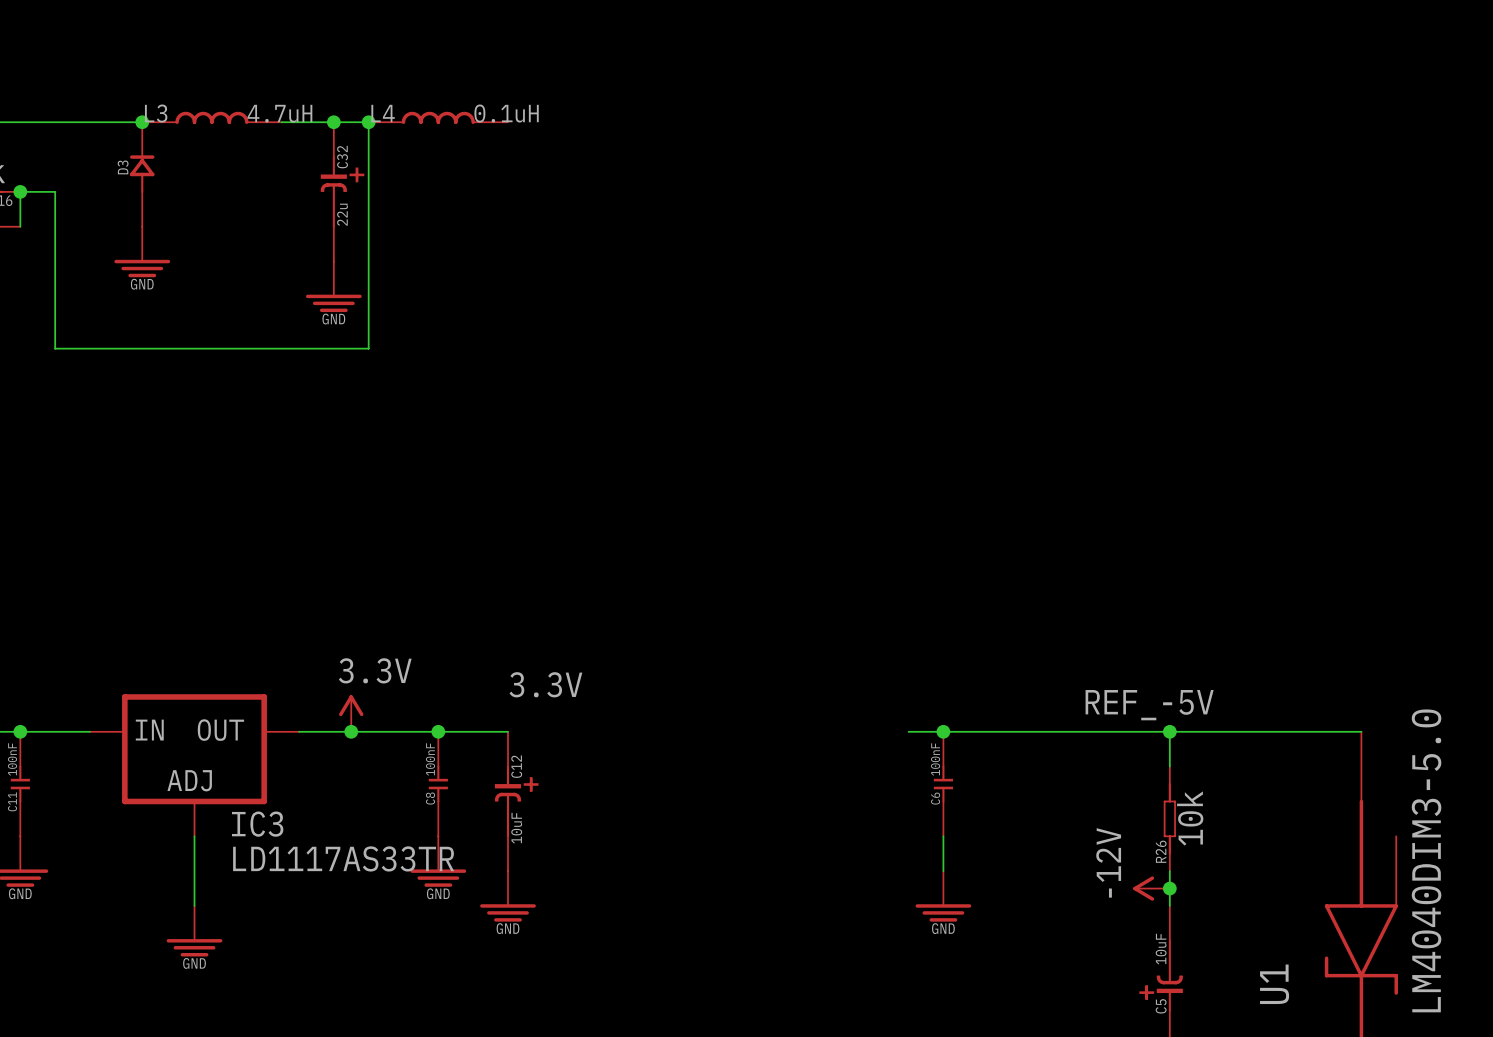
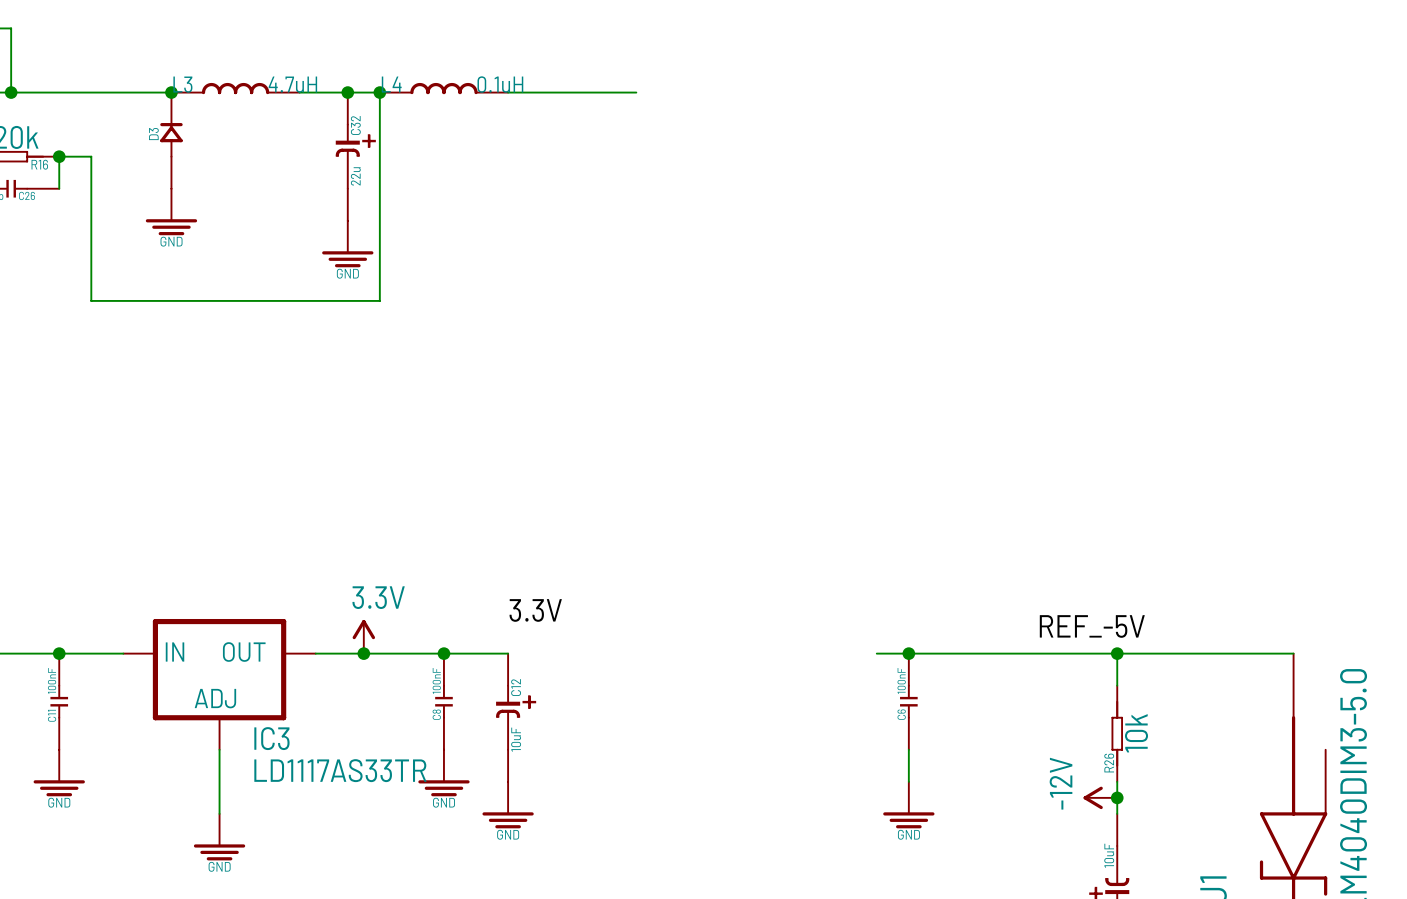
wire: none -> (508, 92) (636, 92)

